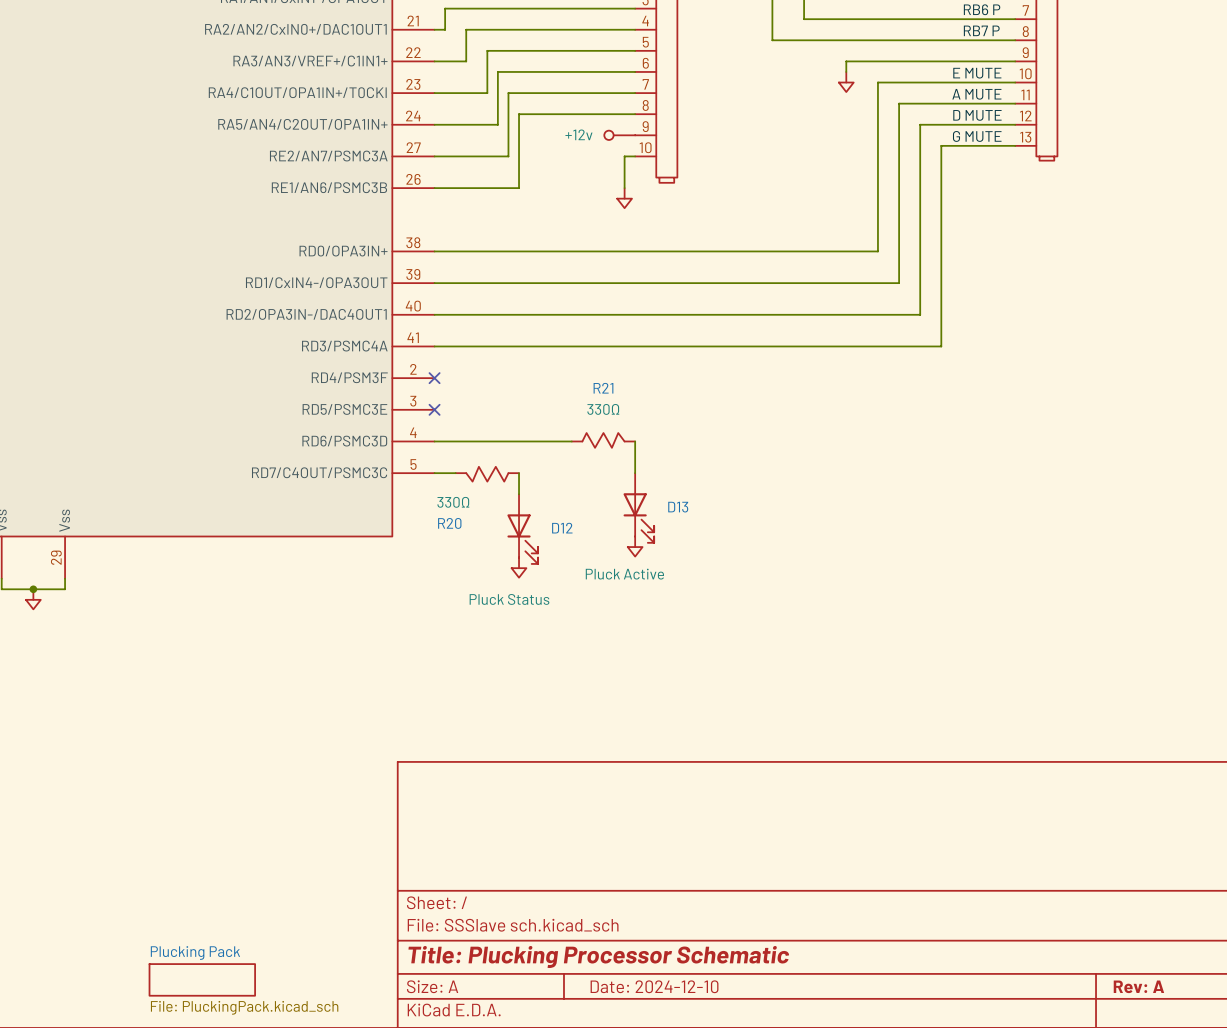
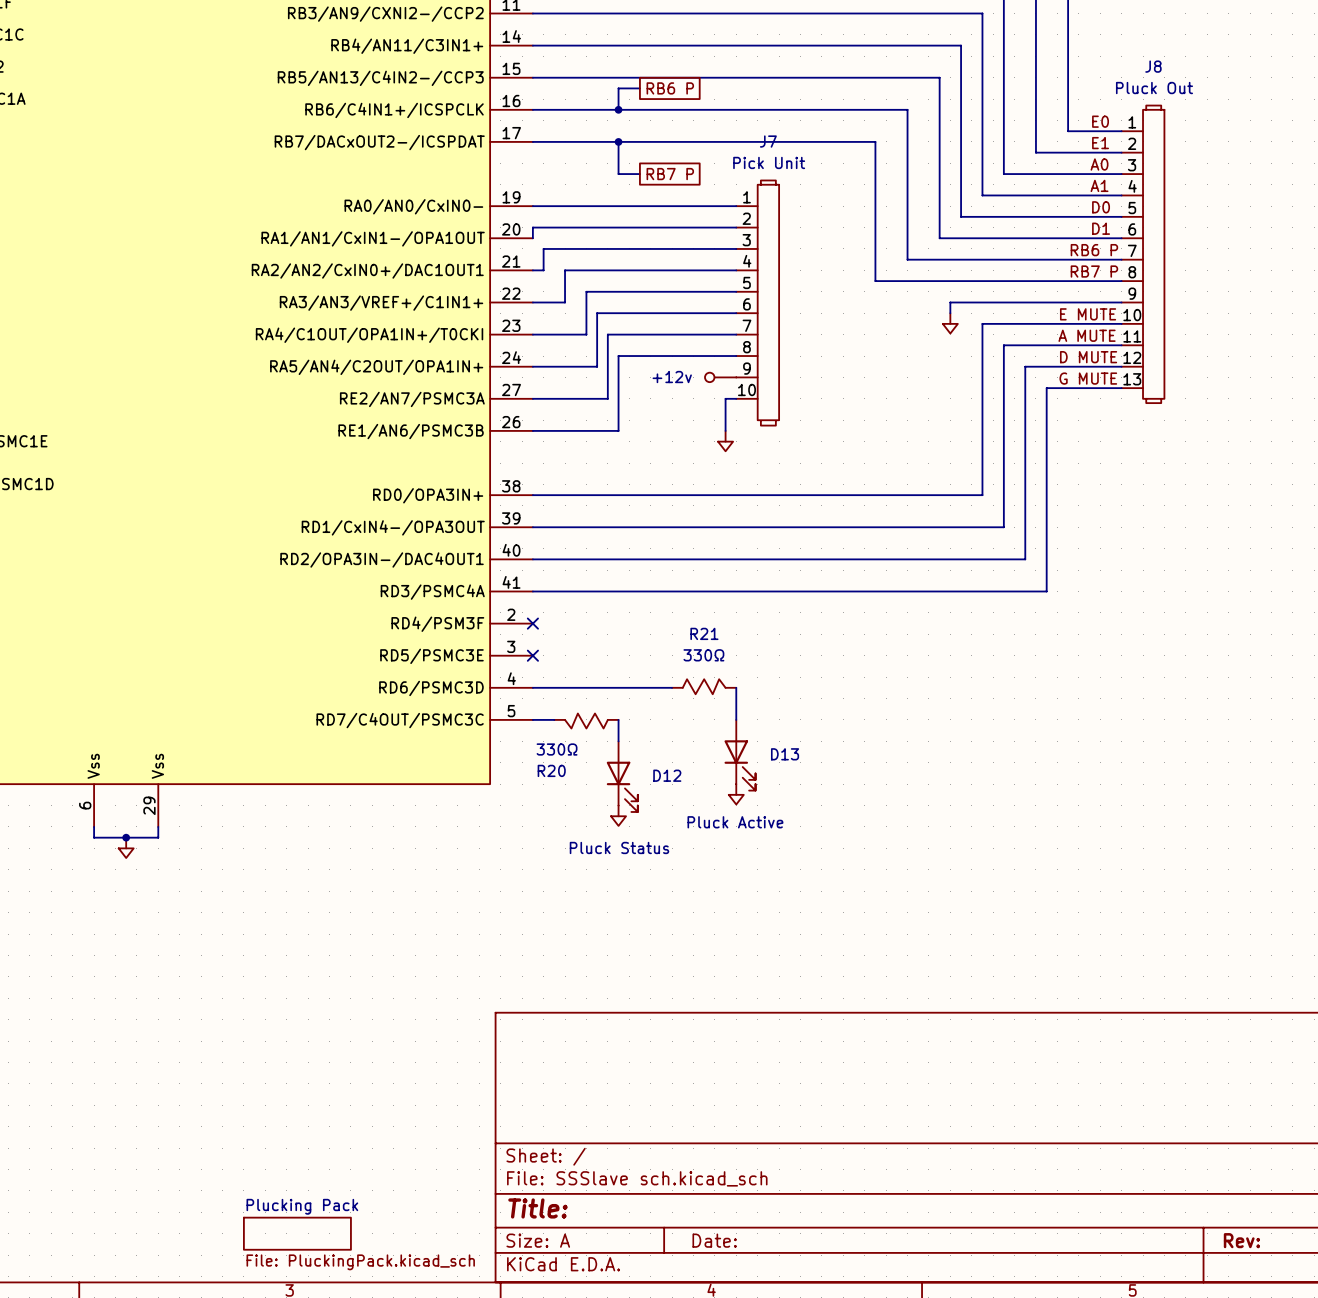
title block: Title: Plucking Processor Schematic (598, 957) -> Title: (537, 1208)
title block: Date: 2024-12-10 (654, 986) -> Date: (714, 1240)
title block: Rev: A (1138, 986) -> Rev: (1241, 1240)

